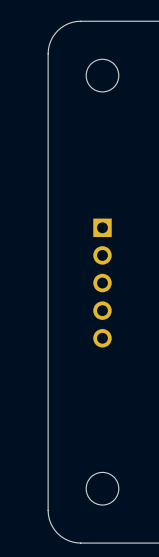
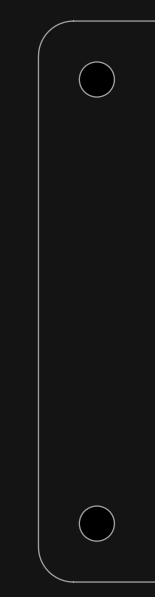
part: (102, 283) -> none

